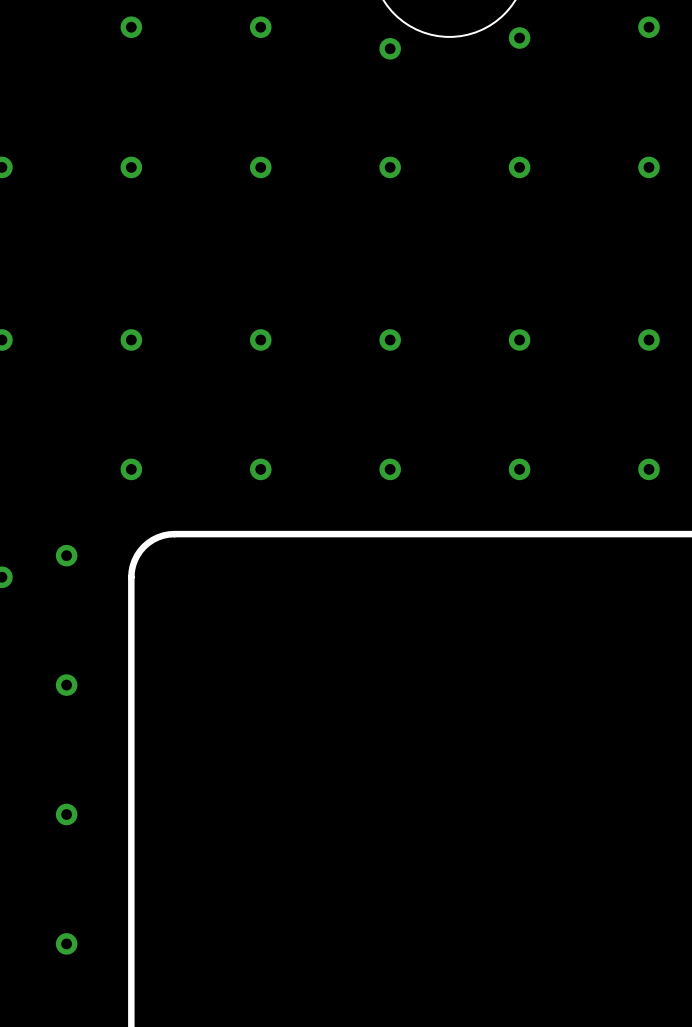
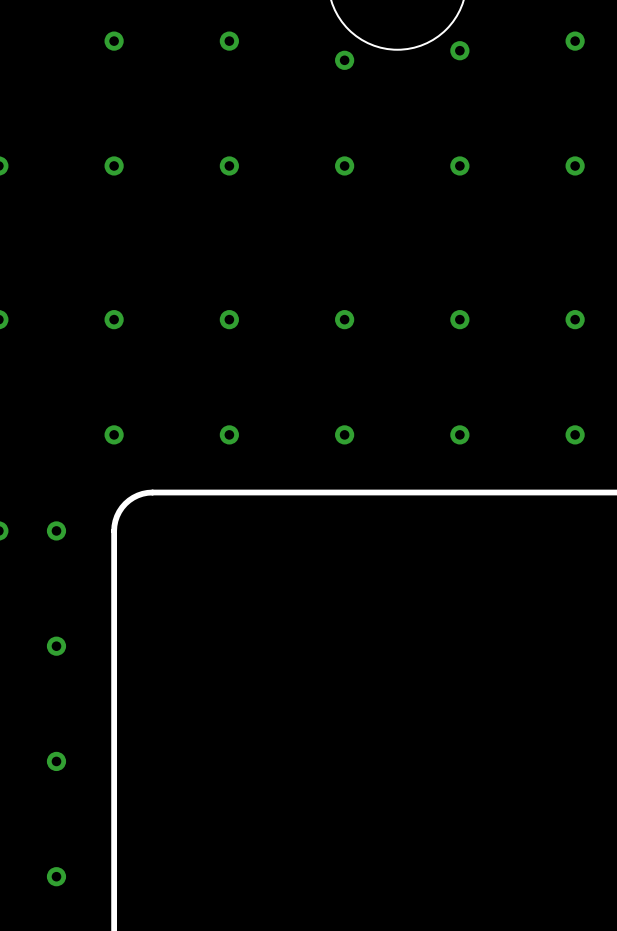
via position: (66, 555) -> (56, 530)
via position: (66, 685) -> (56, 646)
via position: (66, 814) -> (56, 761)
via position: (66, 943) -> (56, 876)

